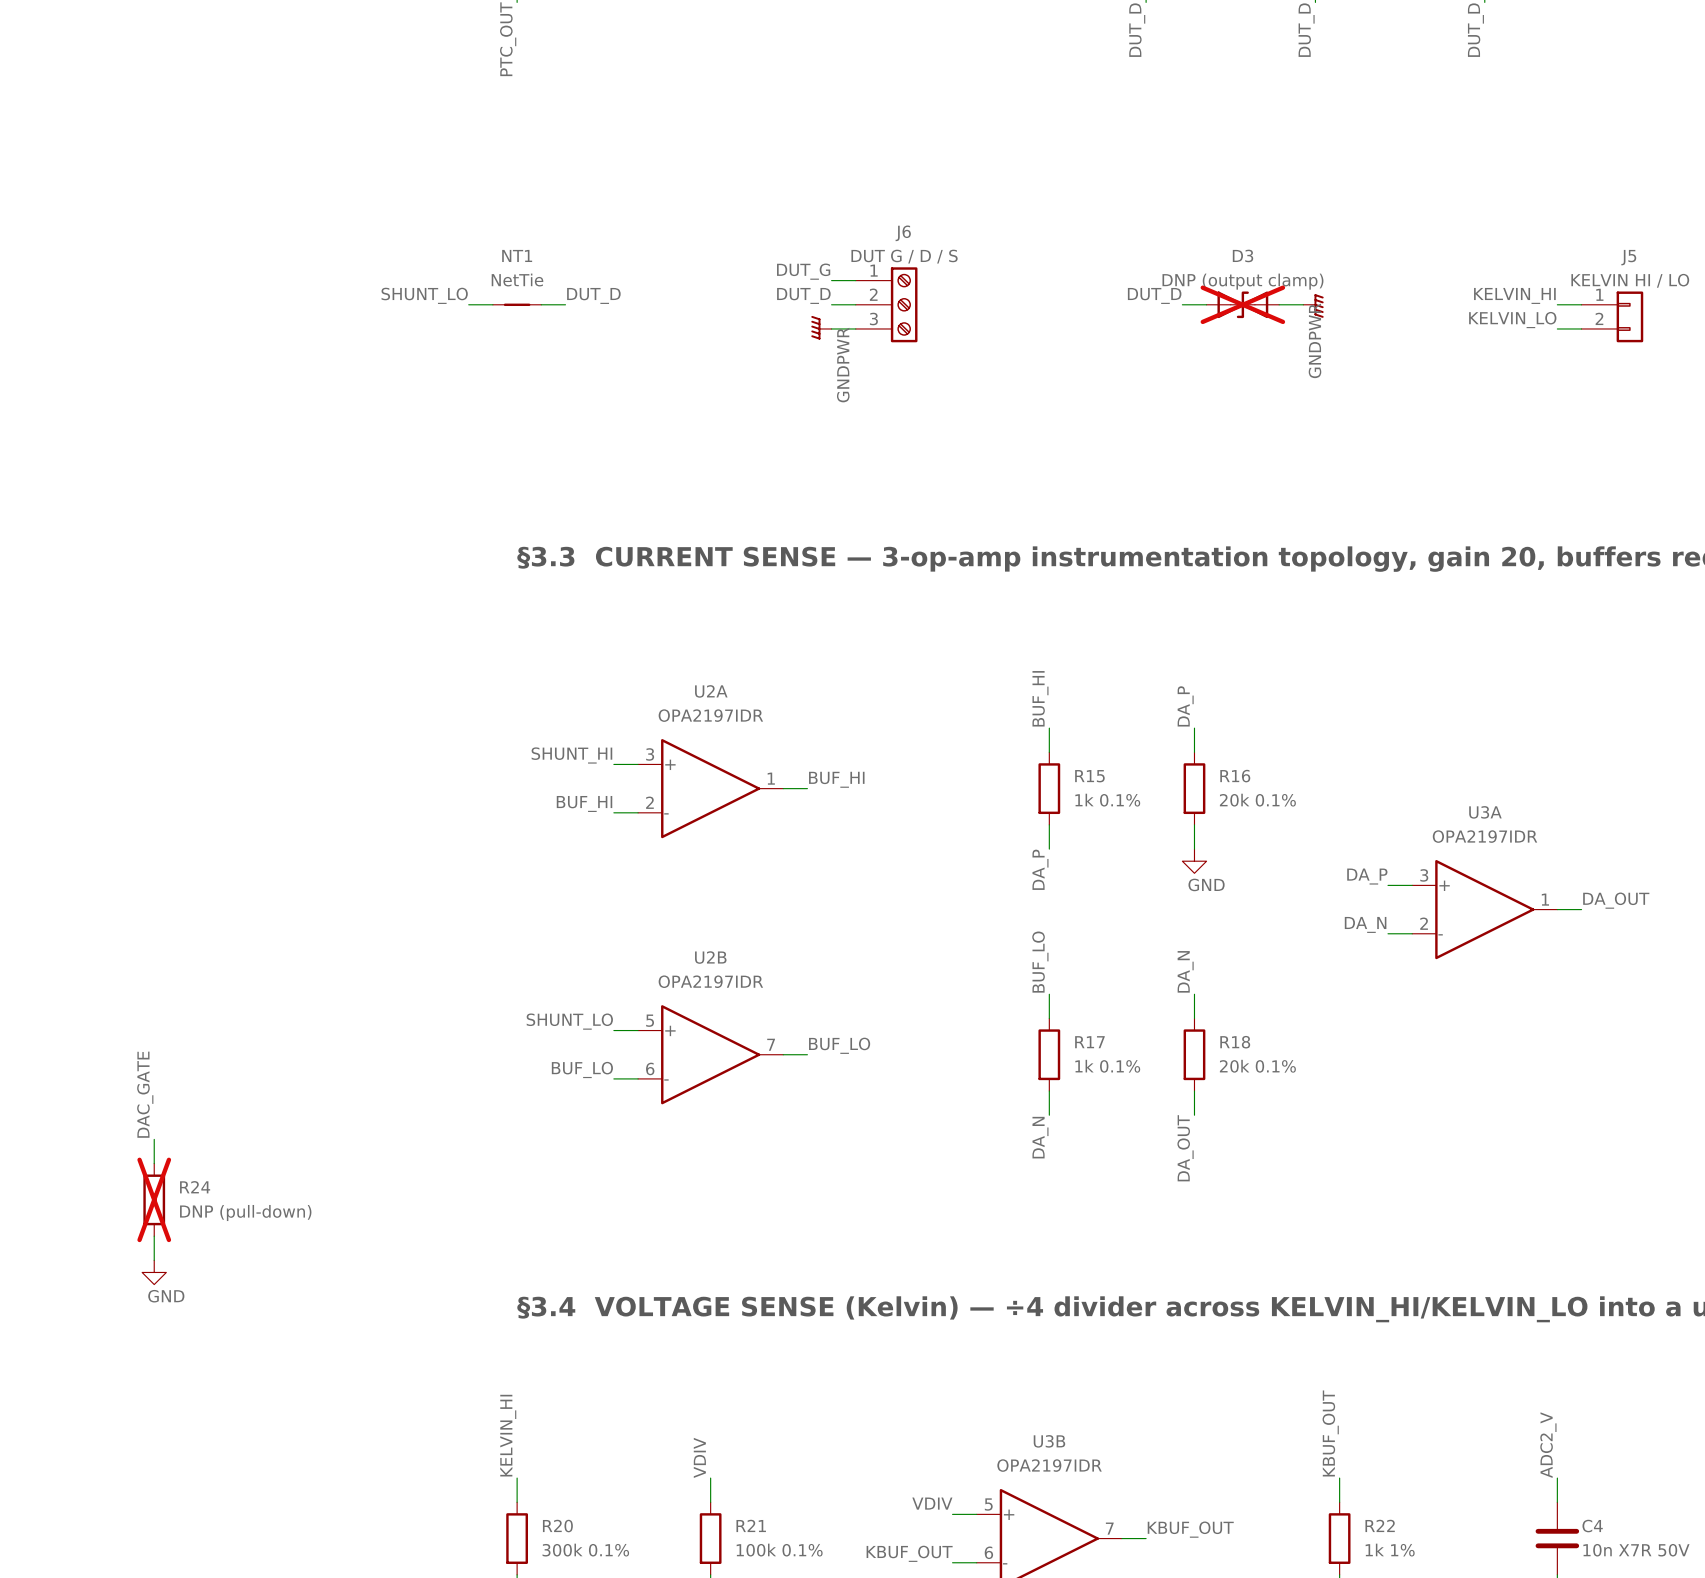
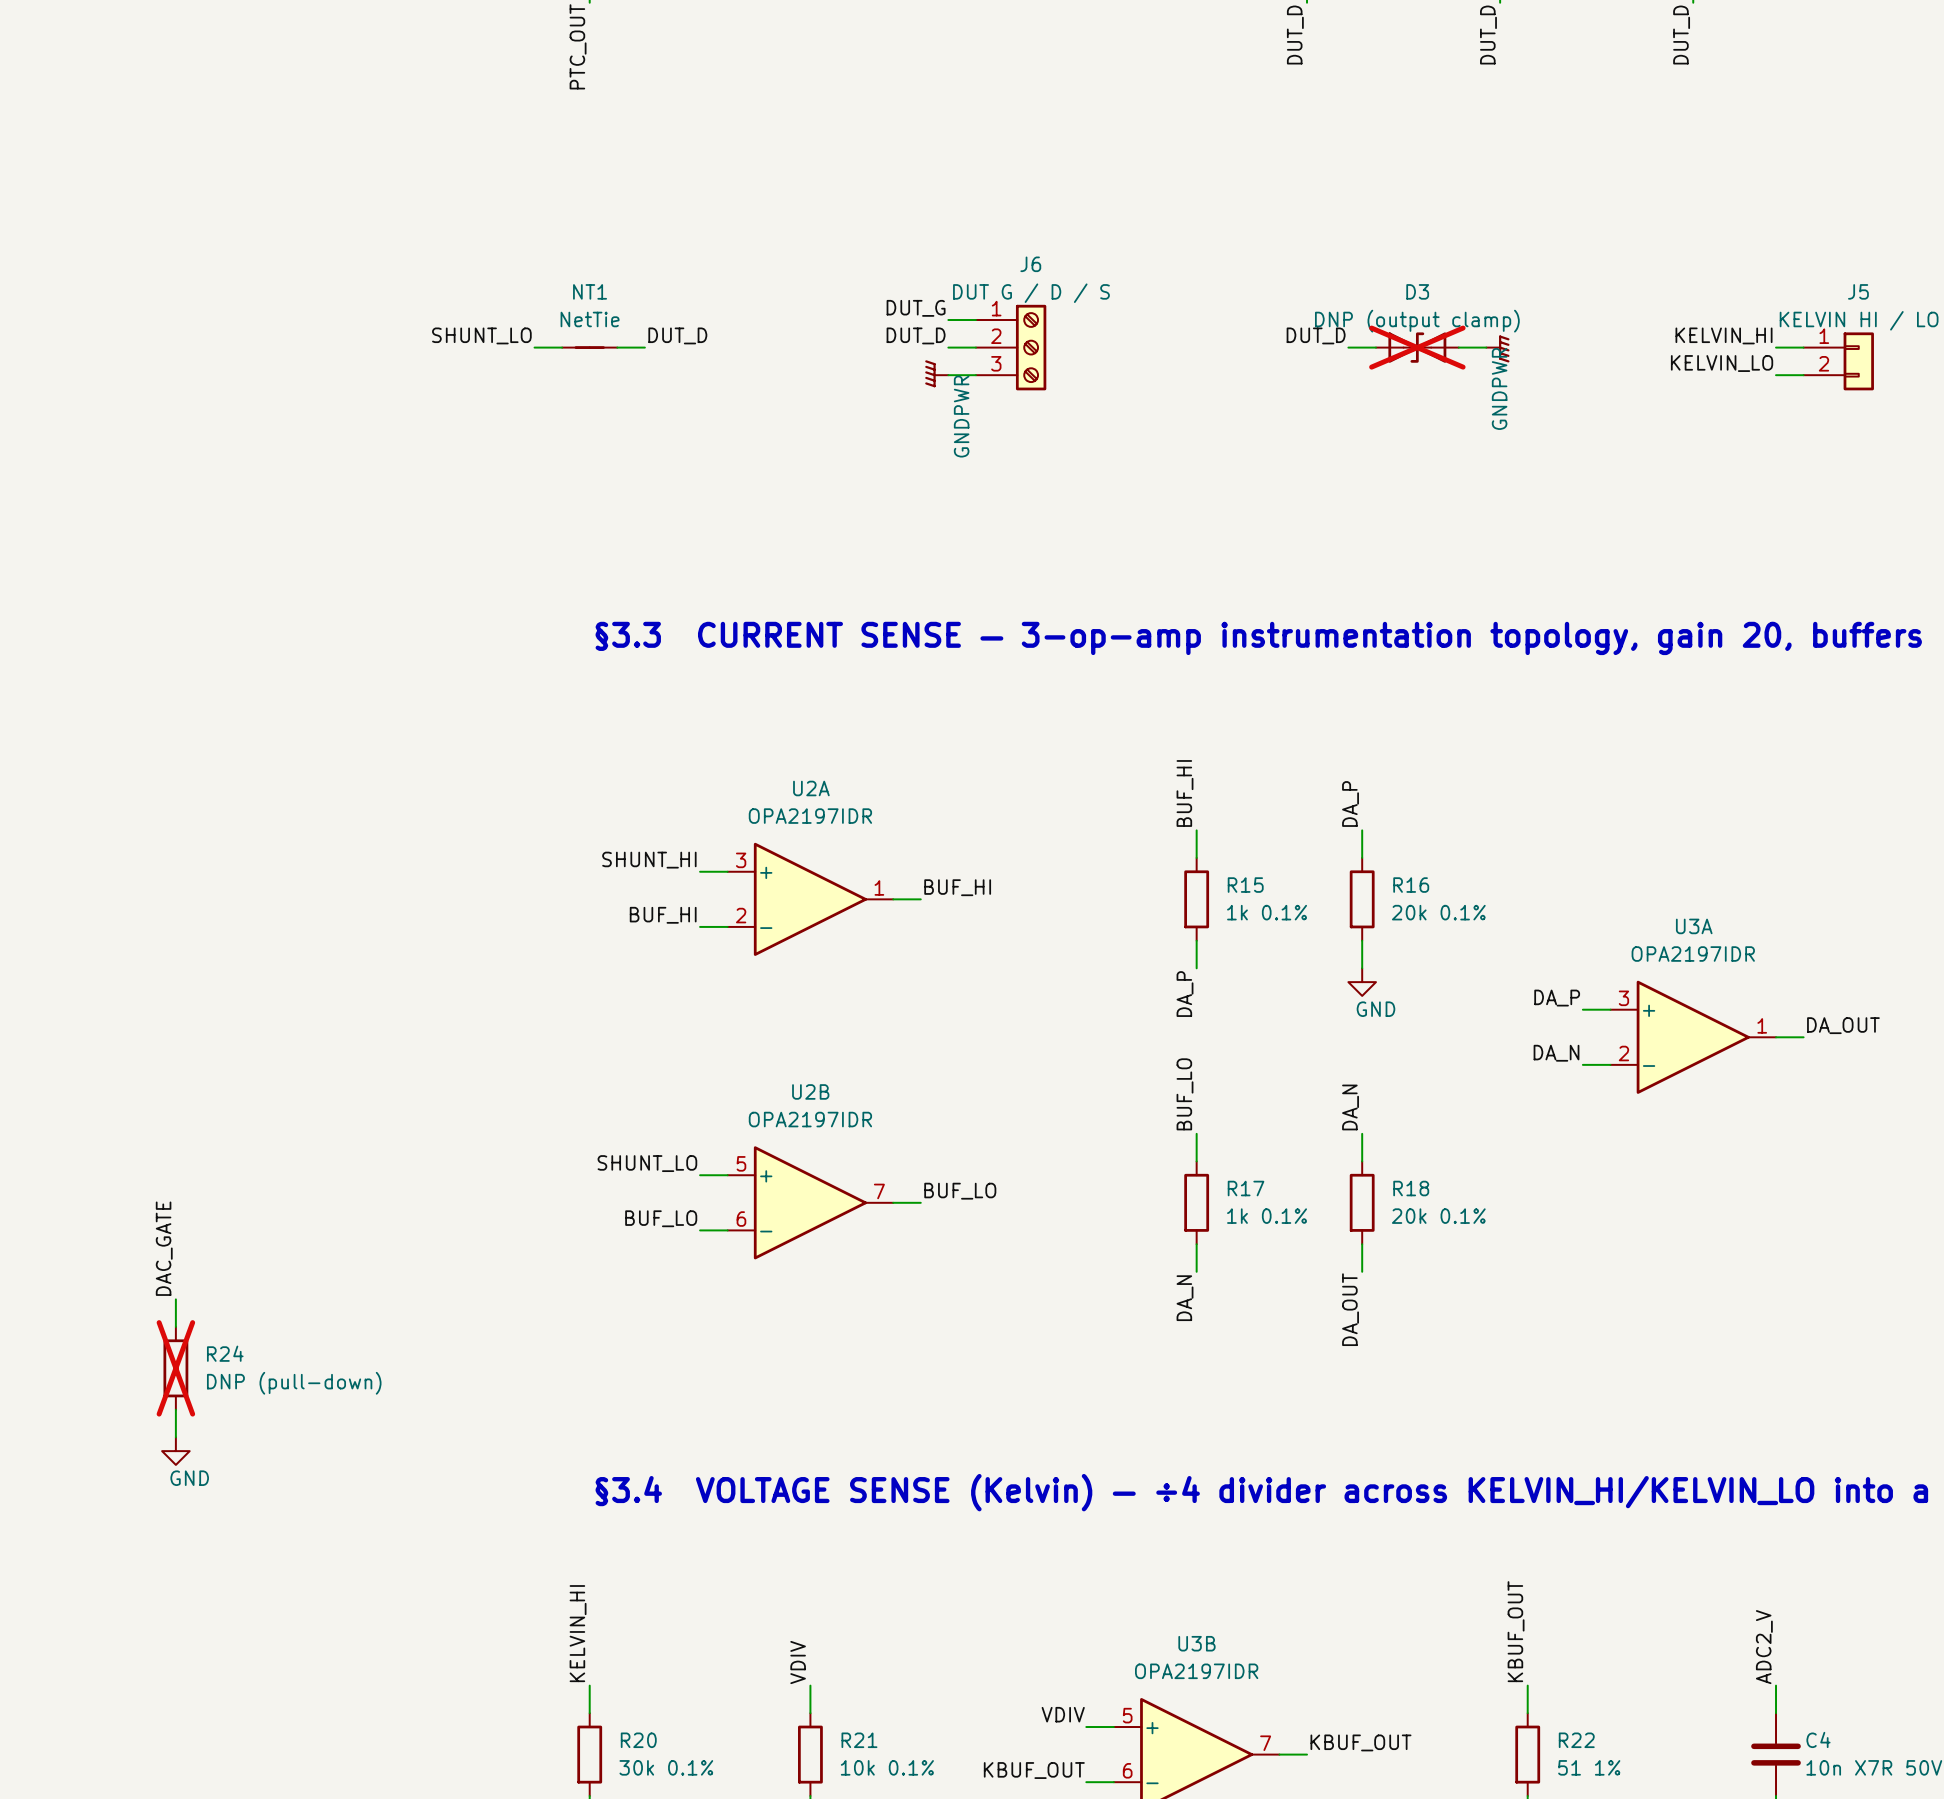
R20 value: 300k 0.1% (585, 1550) -> 30k 0.1% (666, 1767)
R21 value: 100k 0.1% (779, 1550) -> 10k 0.1% (887, 1767)
R22 value: 1k 1% (1390, 1550) -> 51 1% (1589, 1767)

